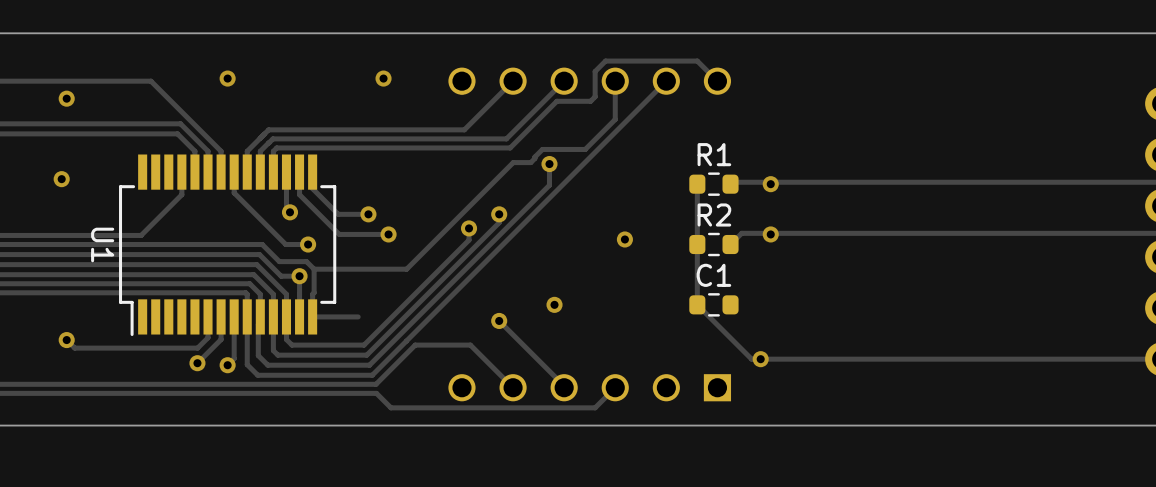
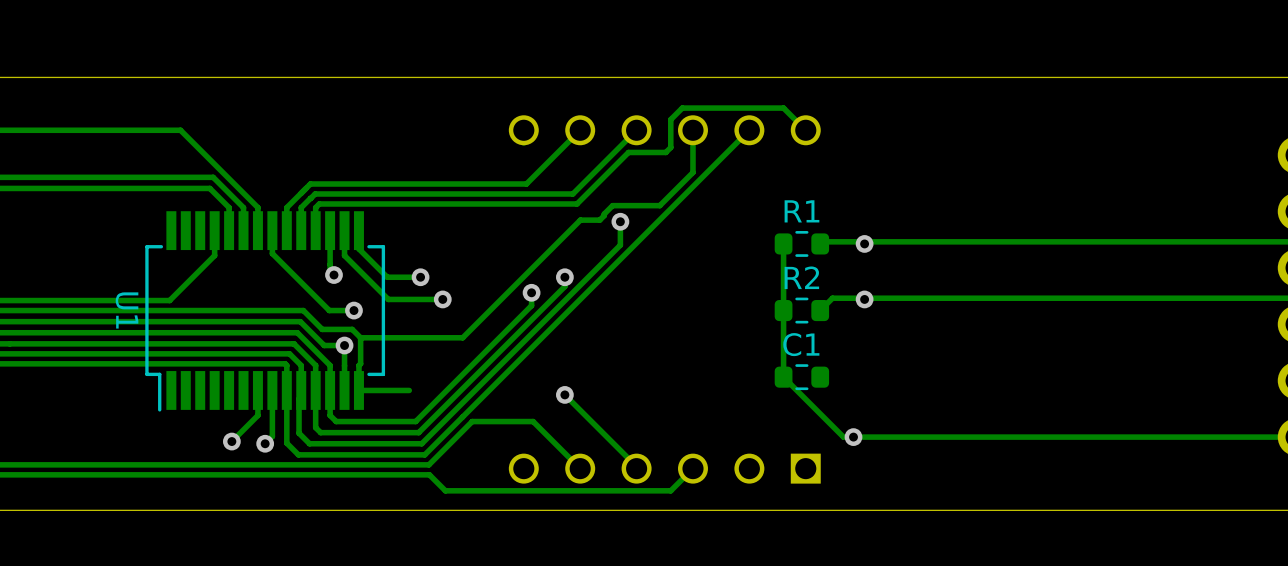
via: (227, 78) -> none
via: (383, 78) -> none
via: (66, 98) -> none
via: (61, 179) -> none
via: (624, 239) -> none
via: (554, 304) -> none
track: (208, 316) (208, 337) (197, 348) (74, 348) (66, 340) -> none
via: (66, 340) -> none

